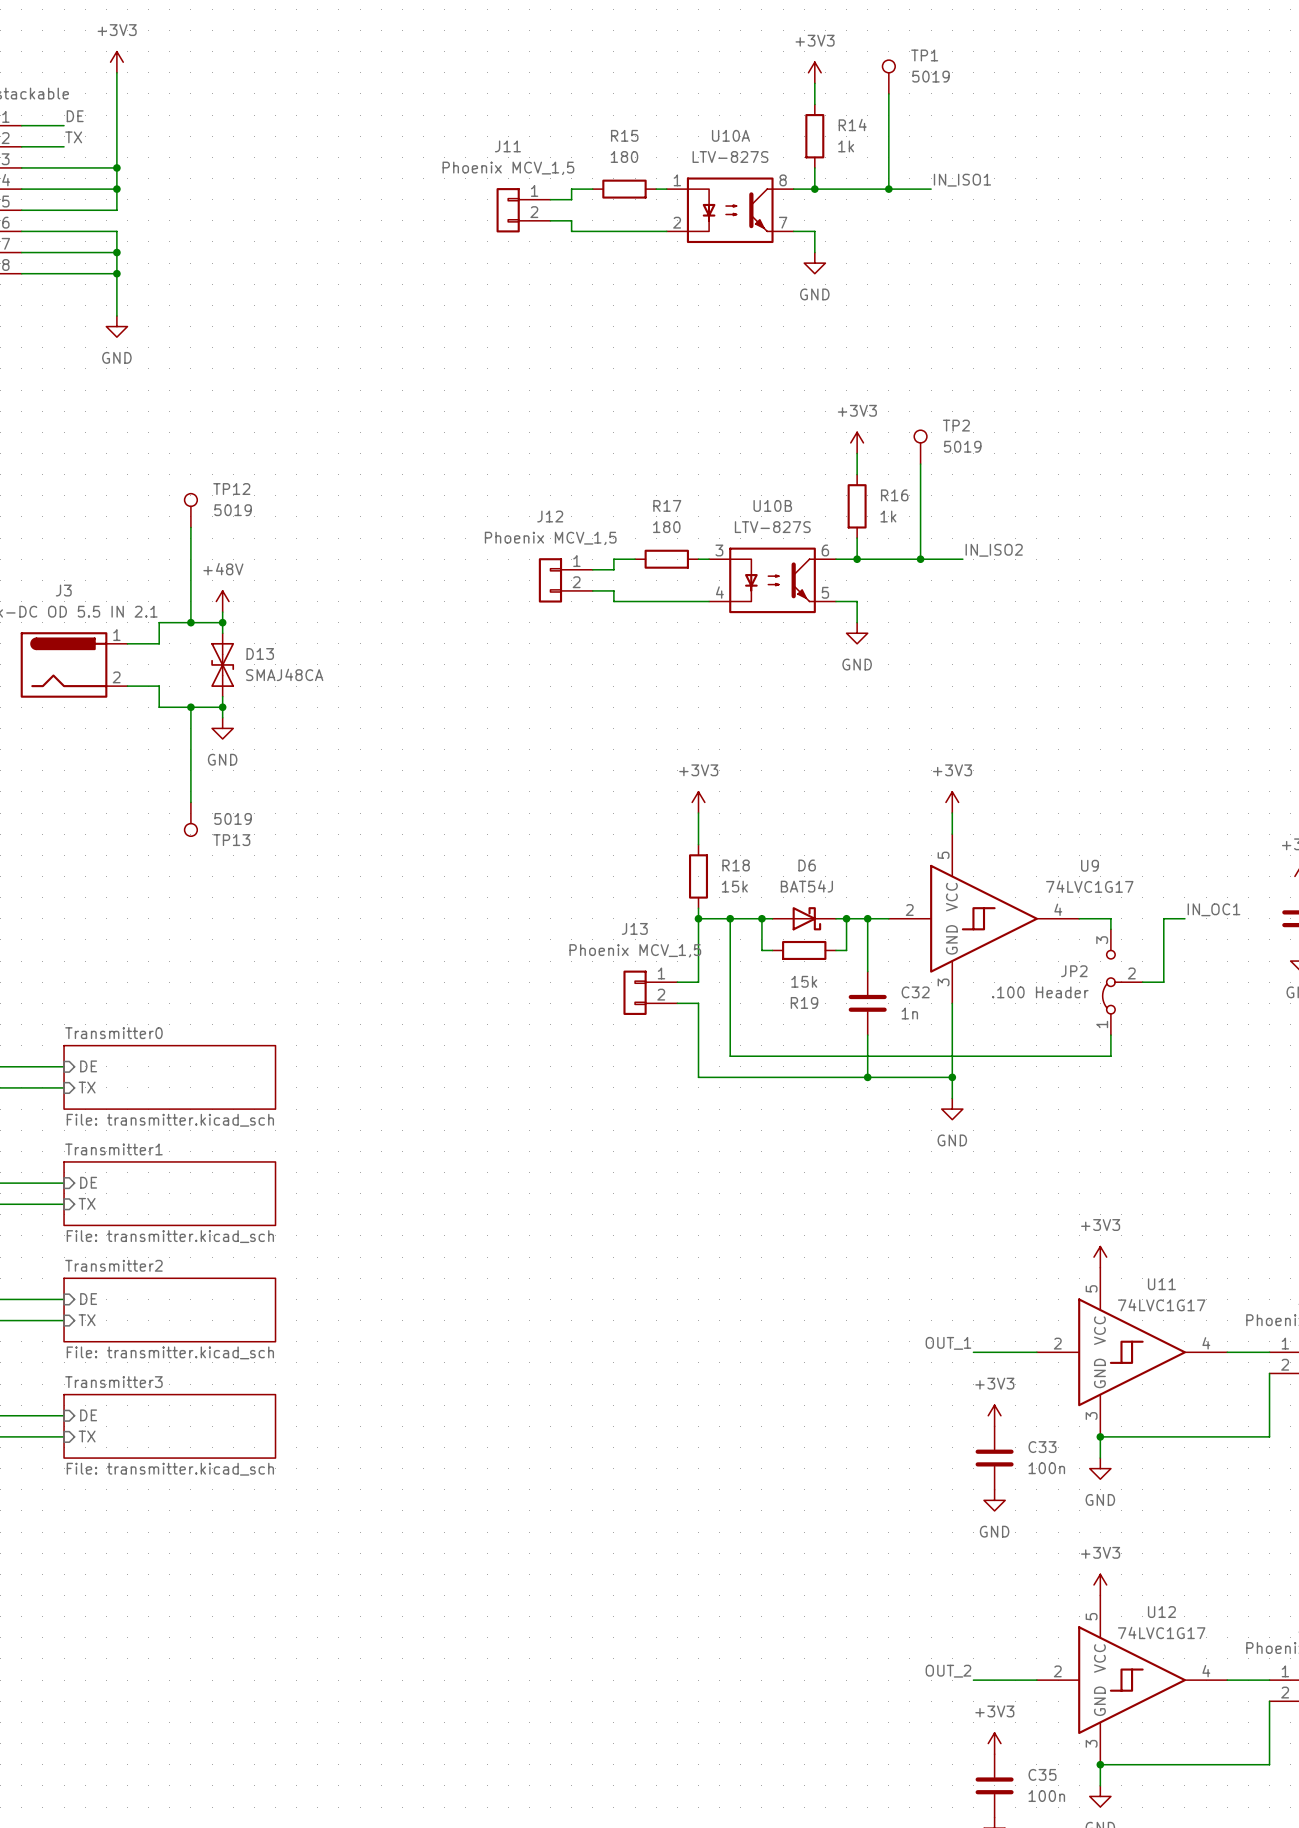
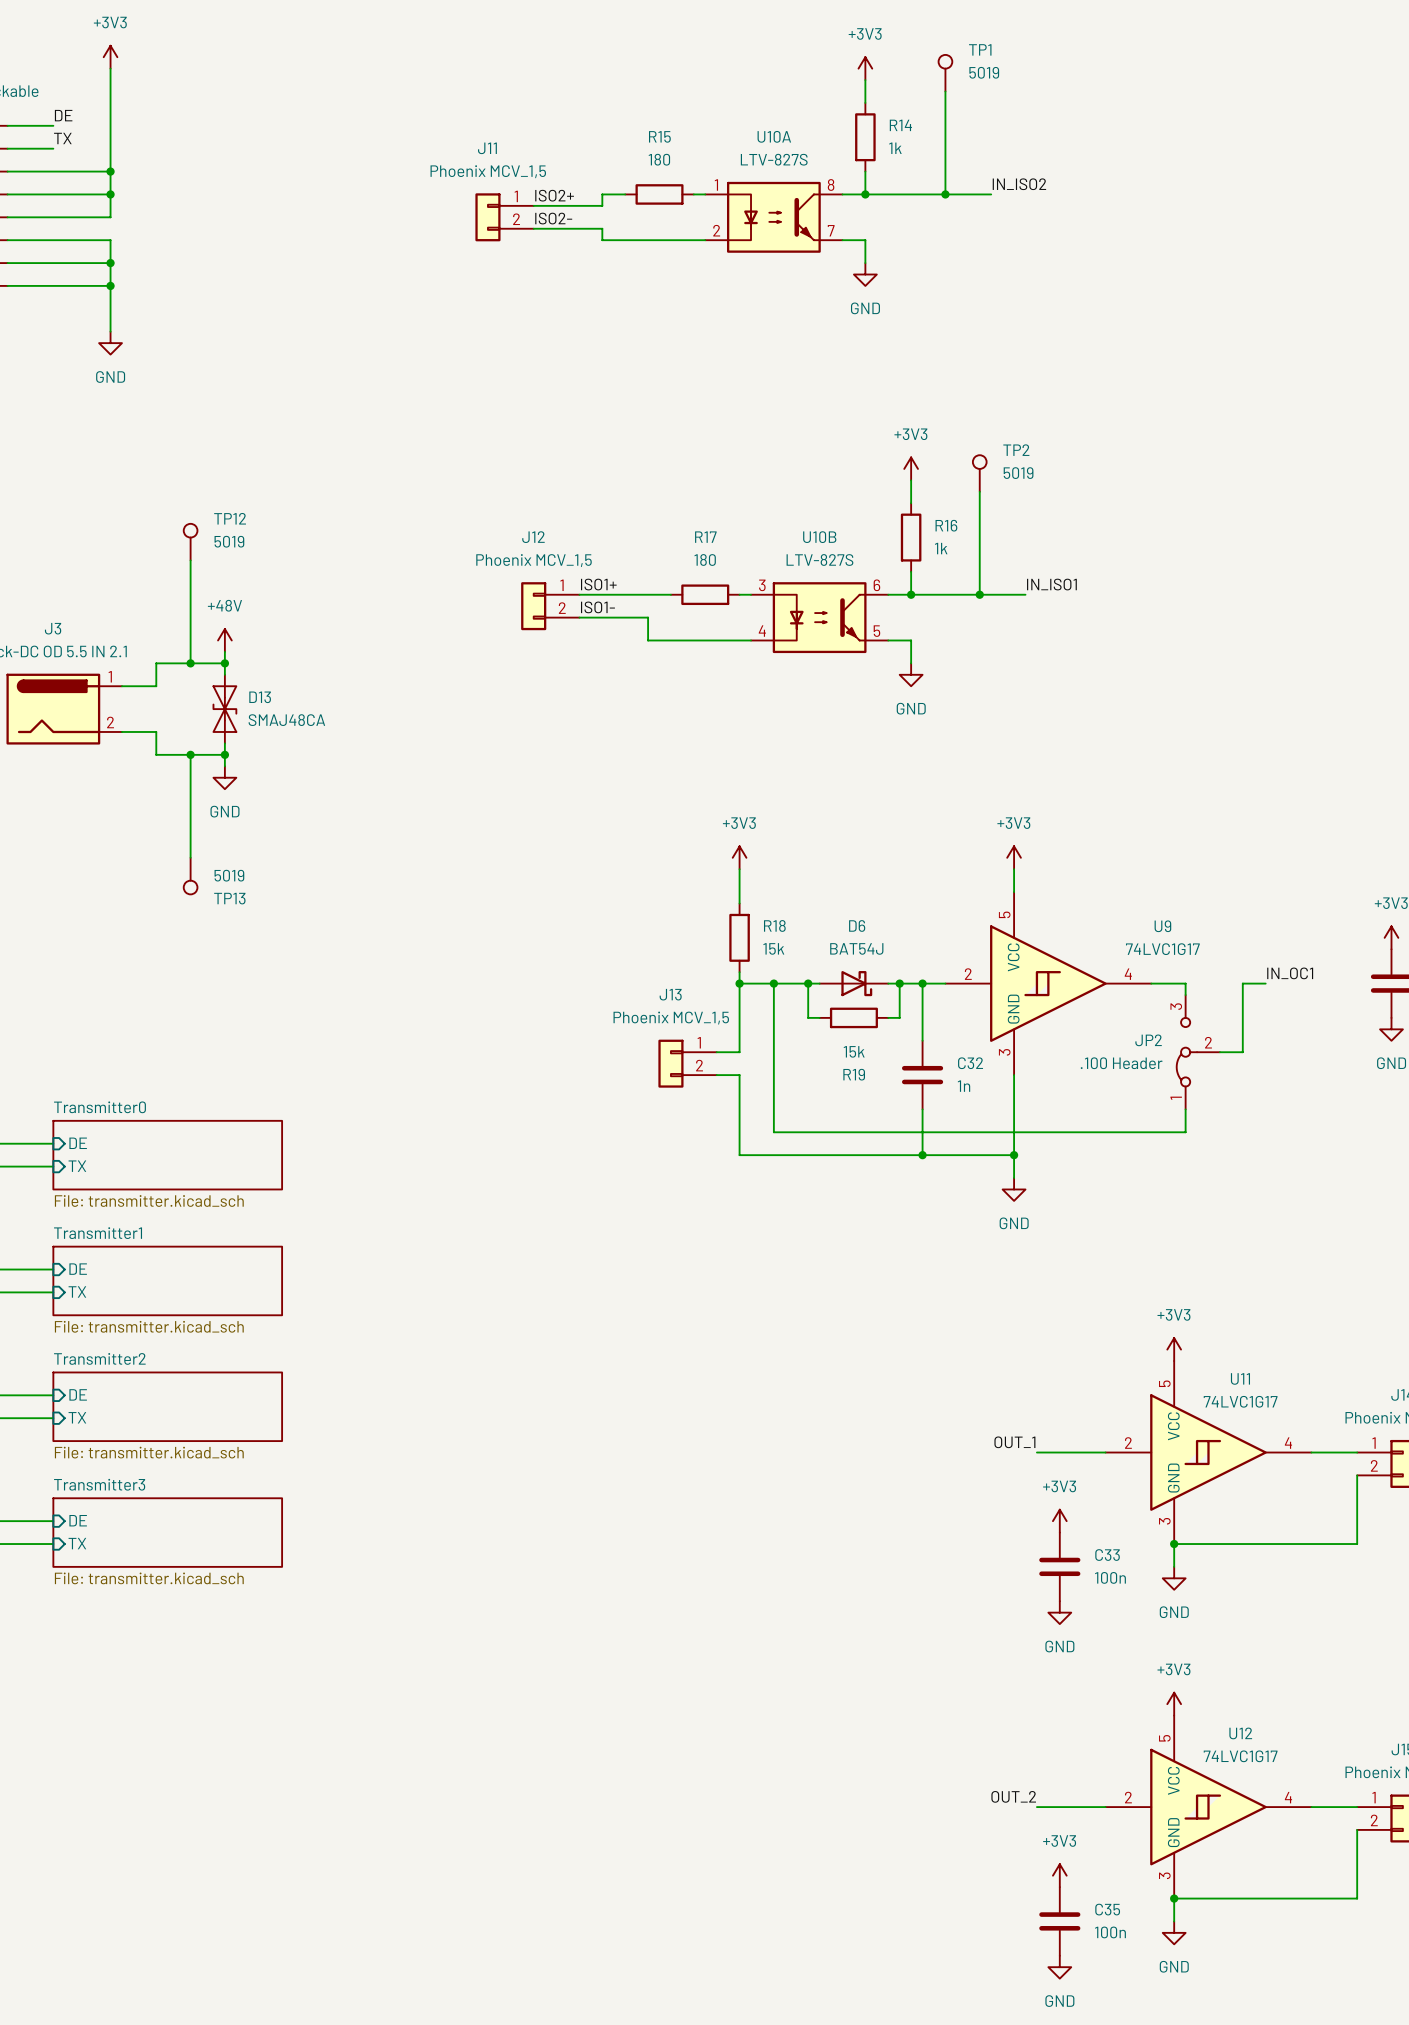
label: IN_ISO1 (962, 180) -> IN_ISO2 (1019, 184)
label: none -> ISO2+ (554, 195)
J11 position: (523, 210) -> (504, 217)
label: none -> ISO2- (553, 218)
label: none -> ISO1+ (598, 584)
label: IN_ISO2 (994, 550) -> IN_ISO1 (1051, 584)
wire: (613, 559) (613, 569) (592, 569) -> (648, 594) (579, 594)
label: none -> ISO1- (597, 607)
J12 position: (565, 580) -> (550, 606)
wire: (592, 590) (613, 590) -> (579, 617) (648, 617) (648, 629)

